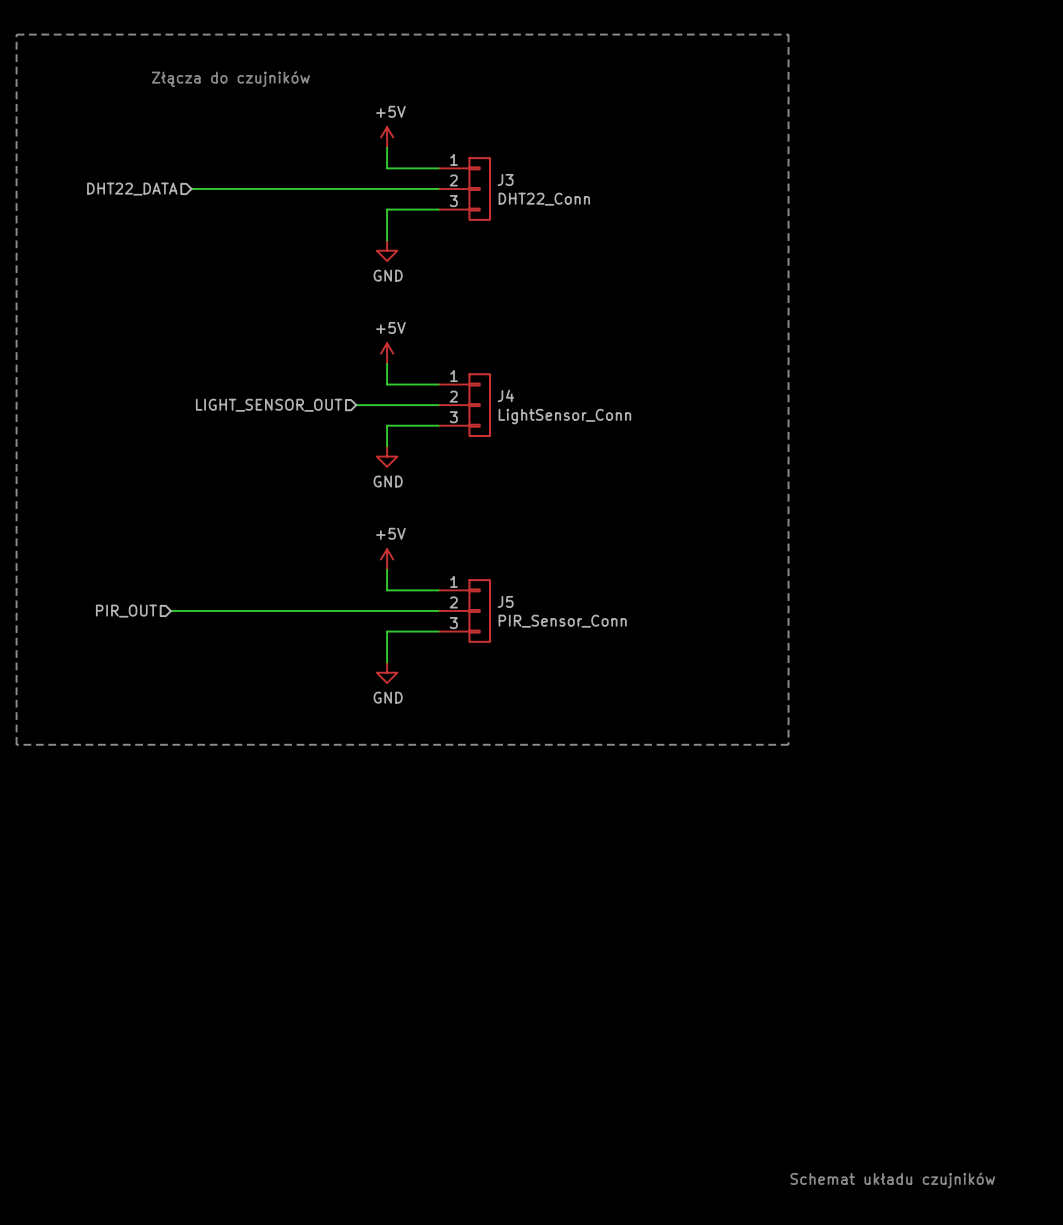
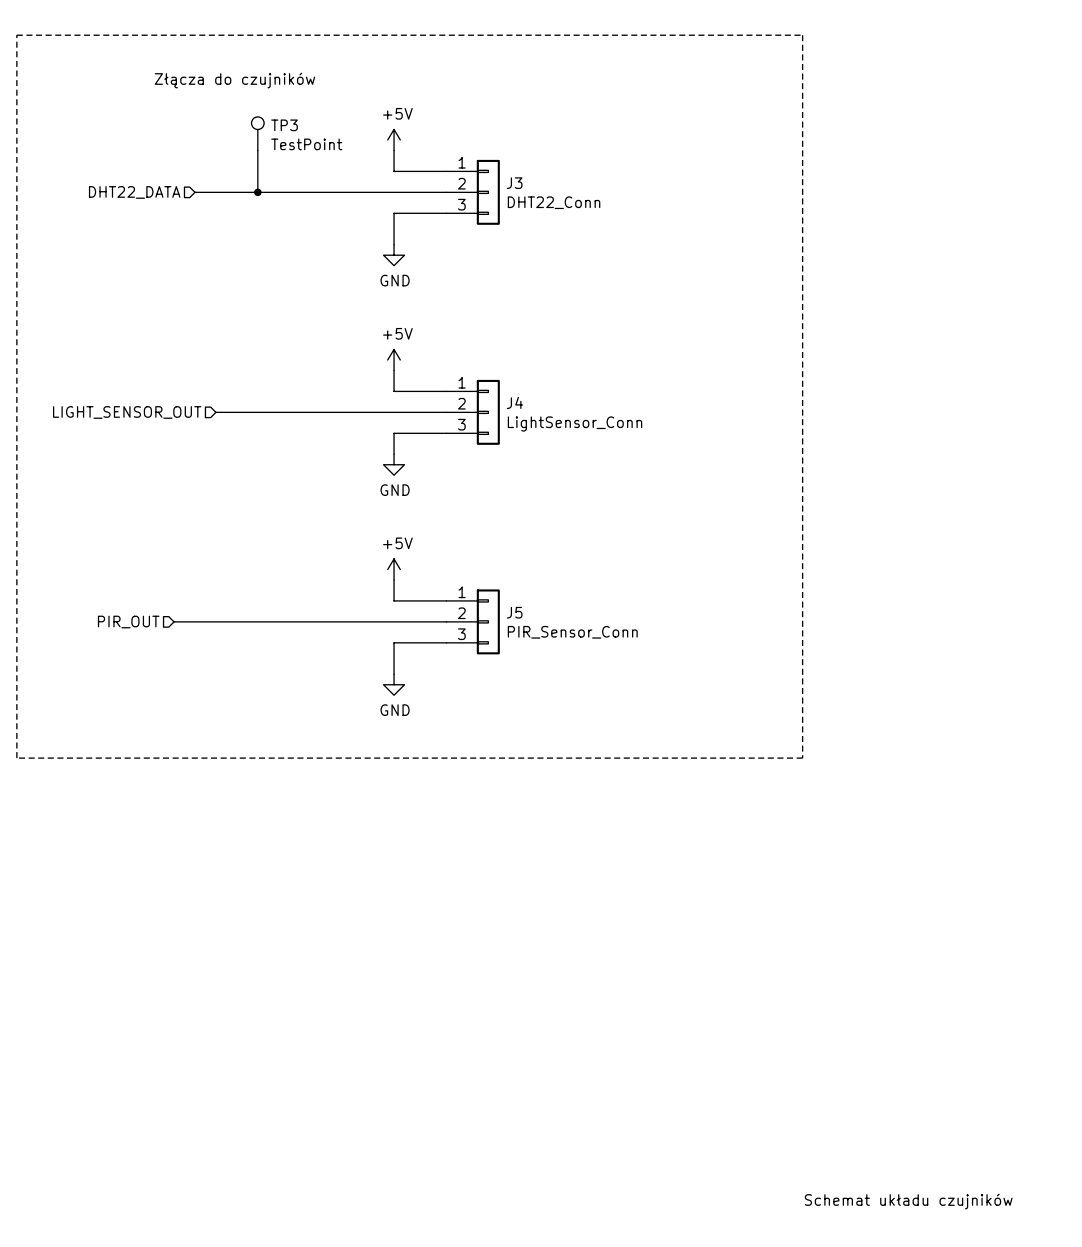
TP3: none -> TestPoint (257, 133)
wire: none -> (257, 150) (257, 192)
junction: none -> (257, 192)
wire: none -> (215, 412) (362, 412)
hierarchical label position: LIGHT_SENSOR_OUT (269, 405) -> LIGHT_SENSOR_OUT (127, 412)

